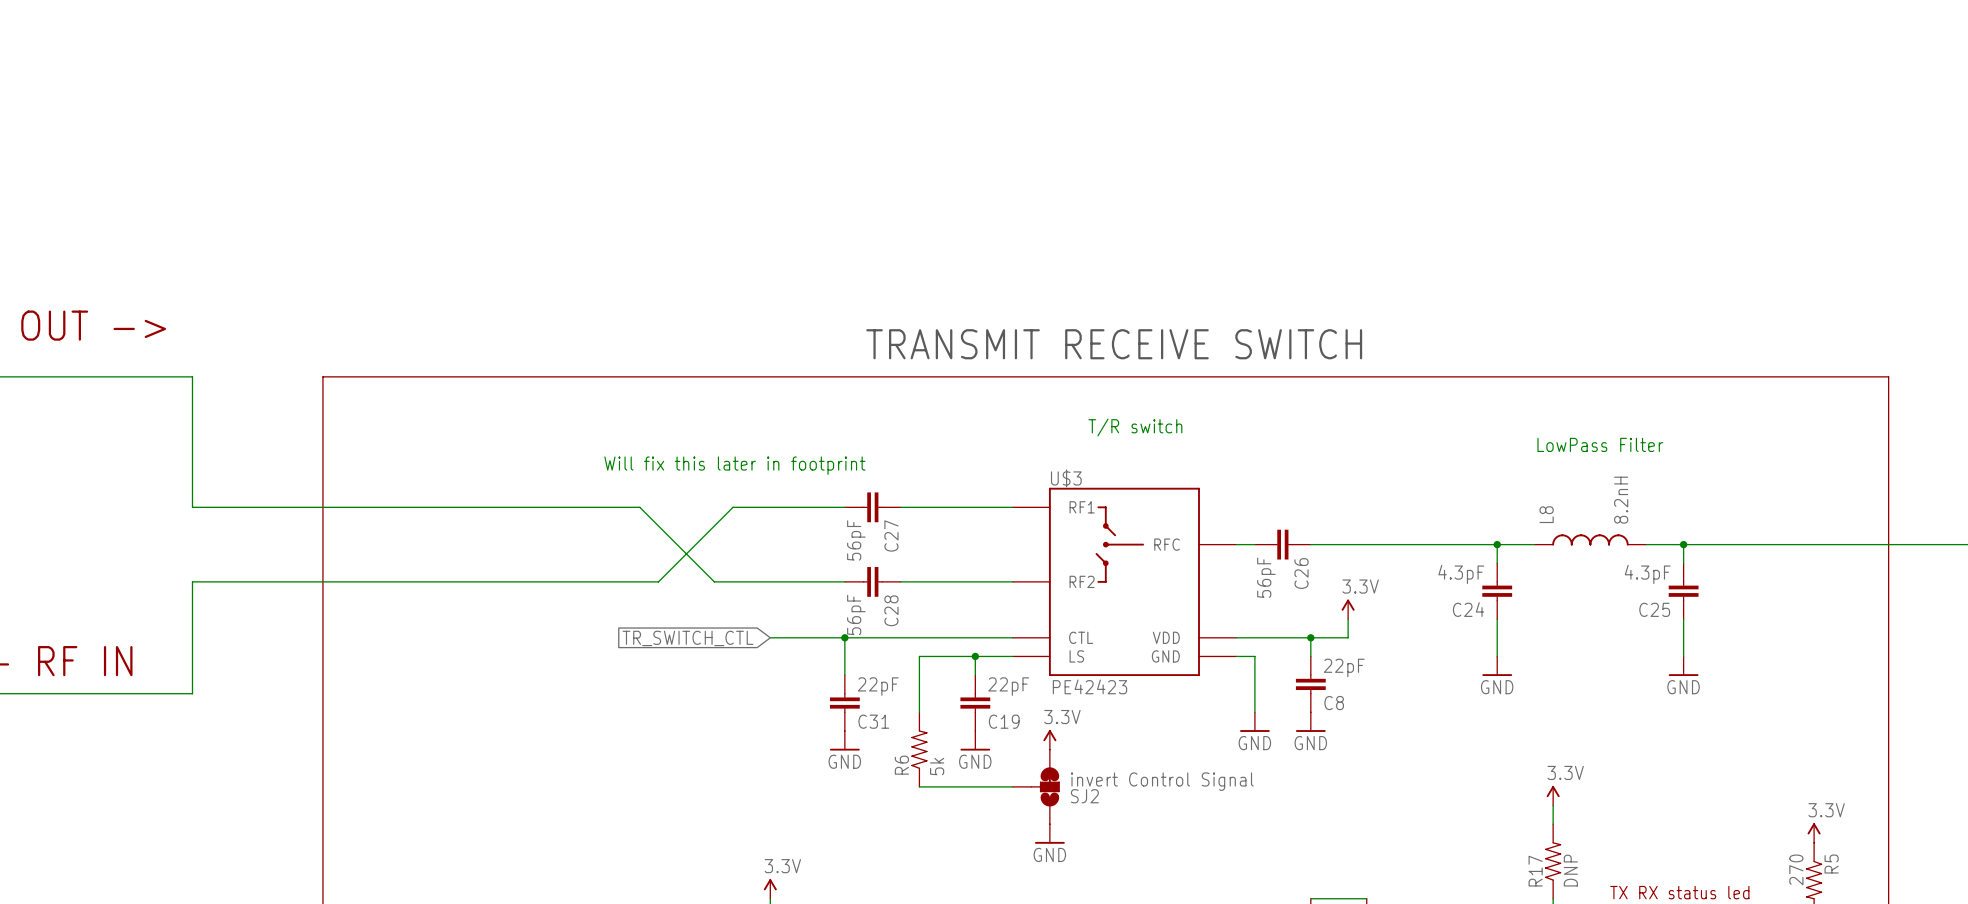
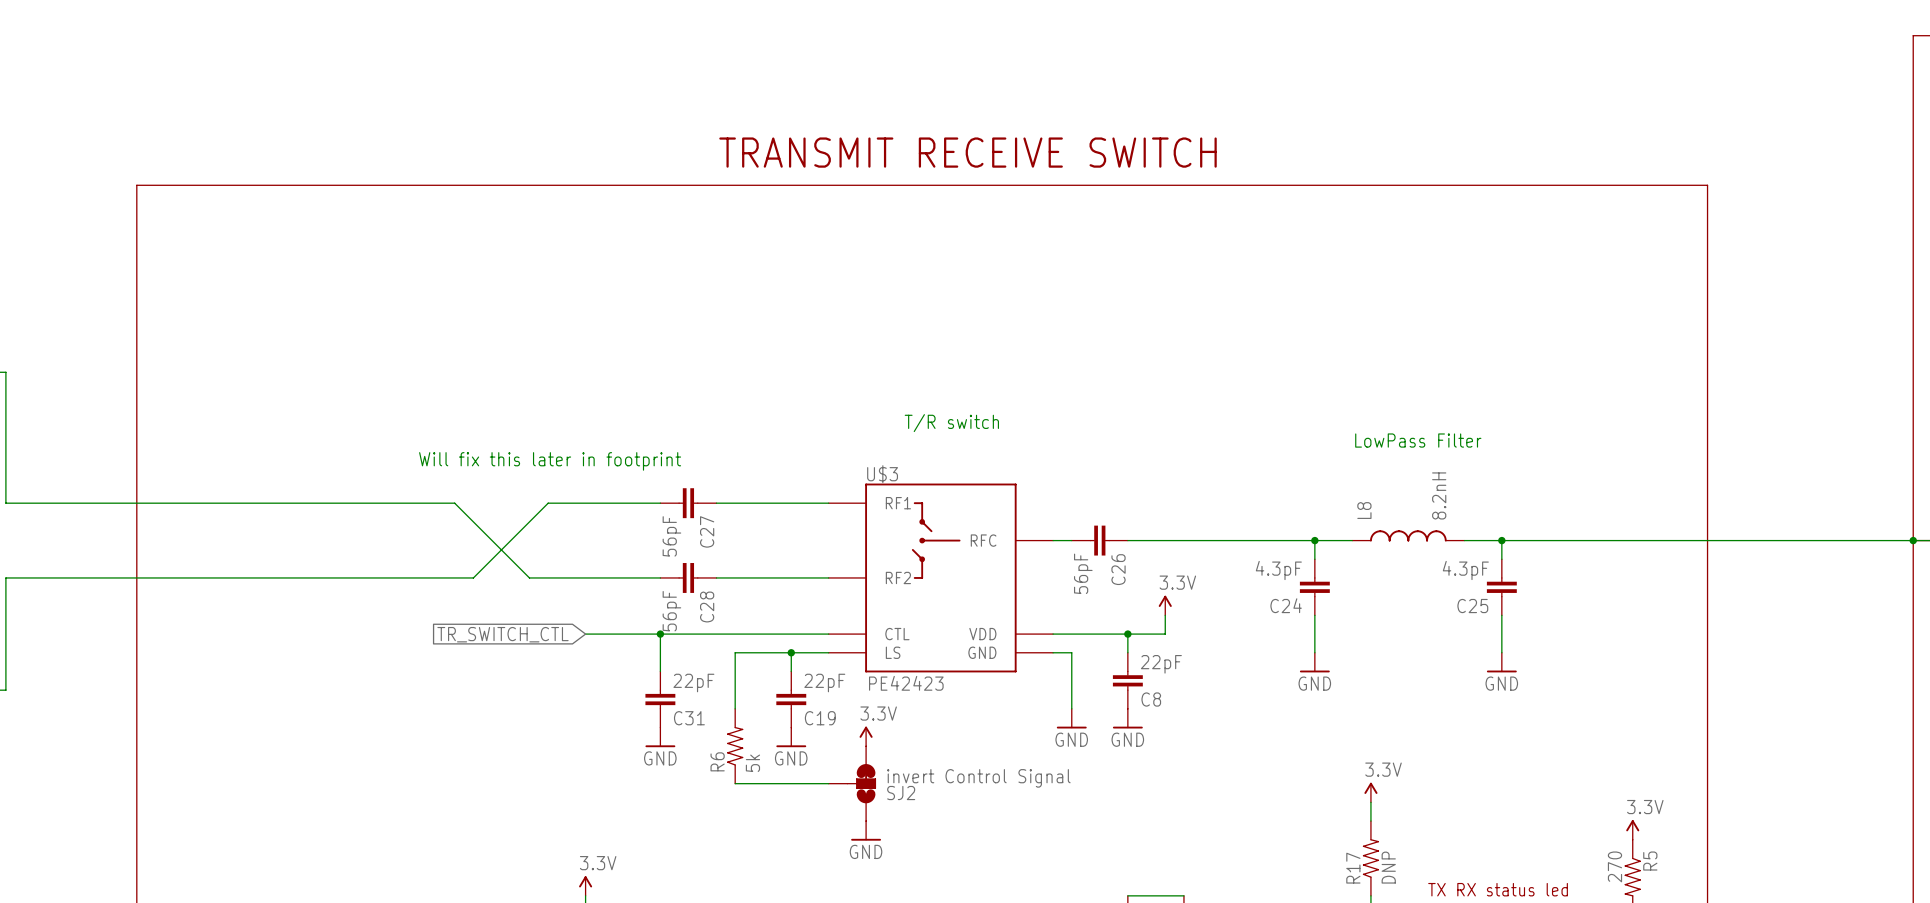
text: none -> TRANSMIT RECEIVE SWITCH (967, 152)
text: TRANSMIT RECEIVE SWITCH (1114, 344) -> none
line: (322, 376) (1888, 376) -> (136, 372) (136, 185) (1707, 185) (1707, 372)

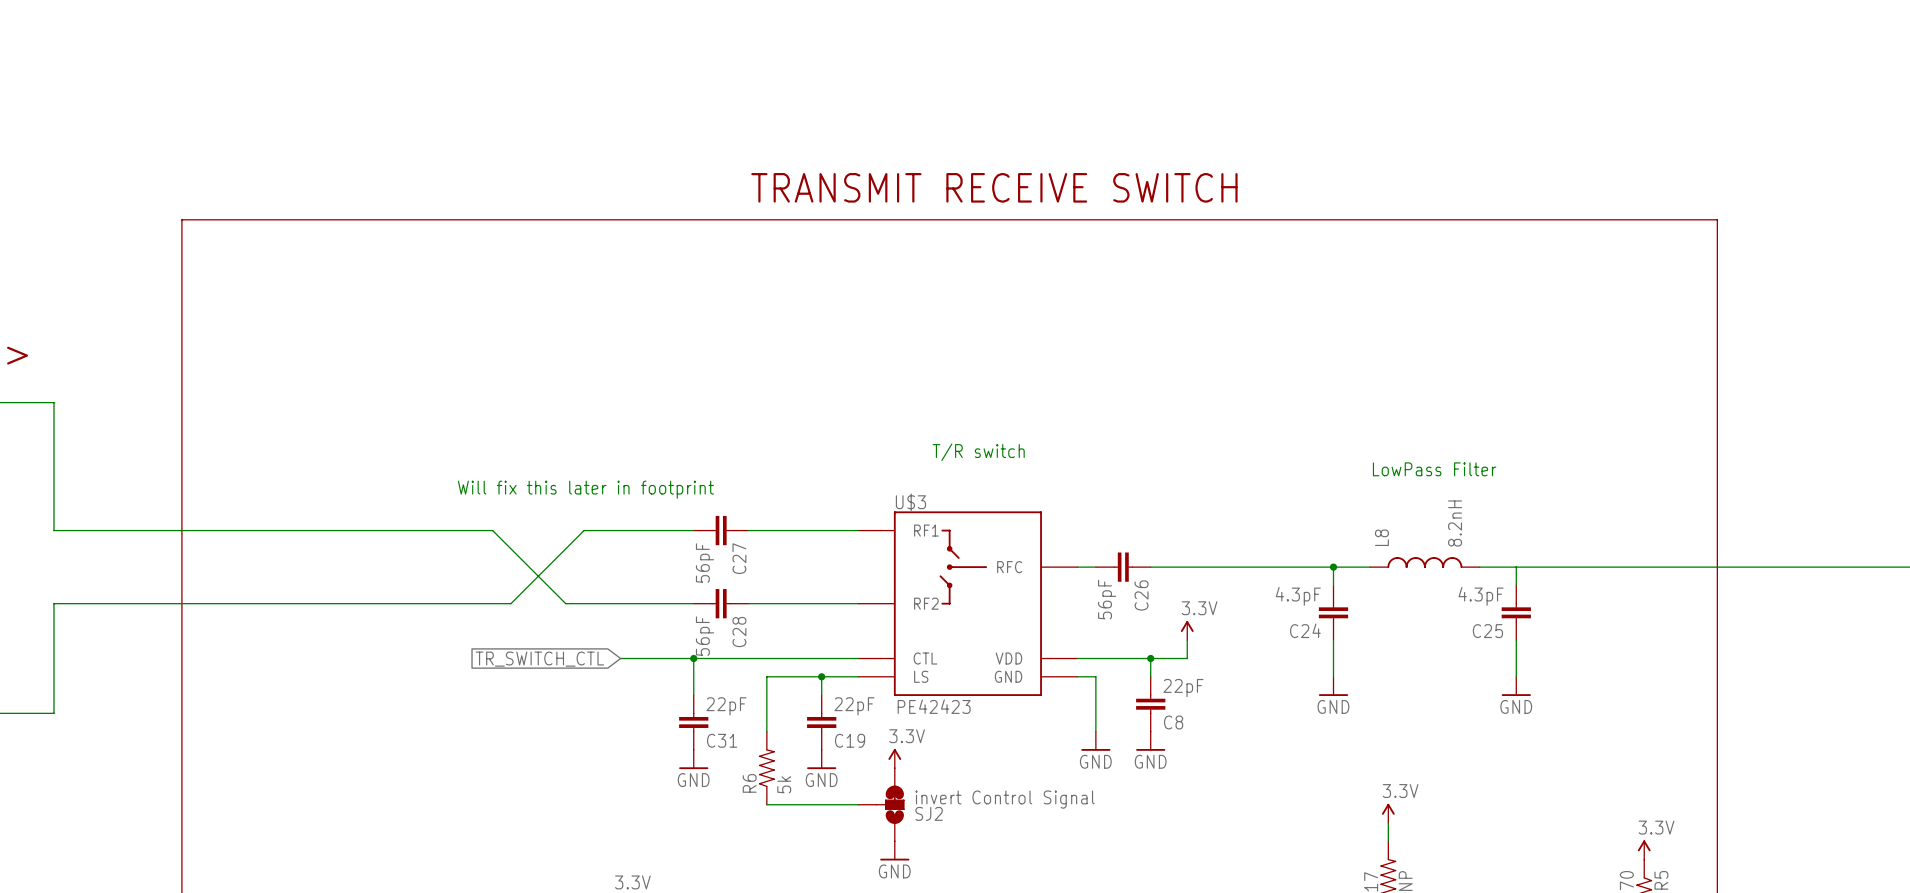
junction: (1501, 540) -> none

